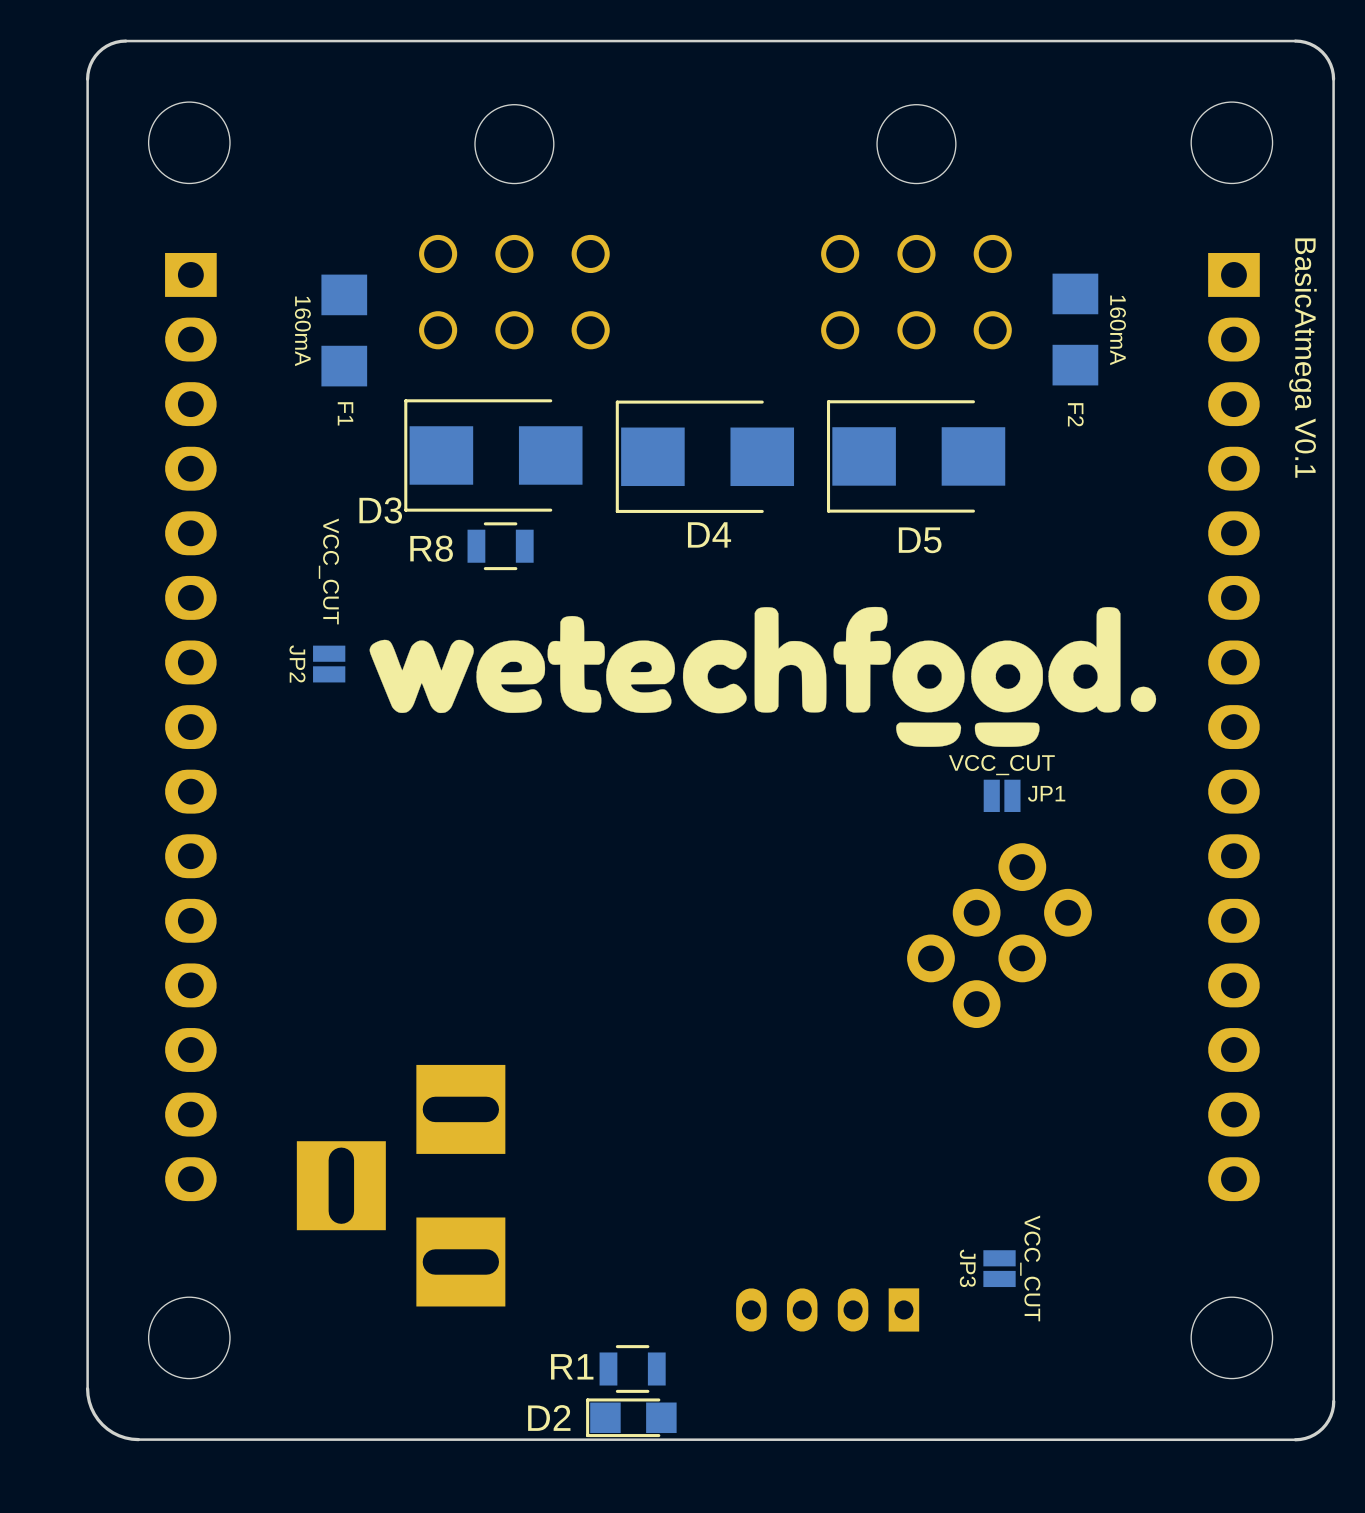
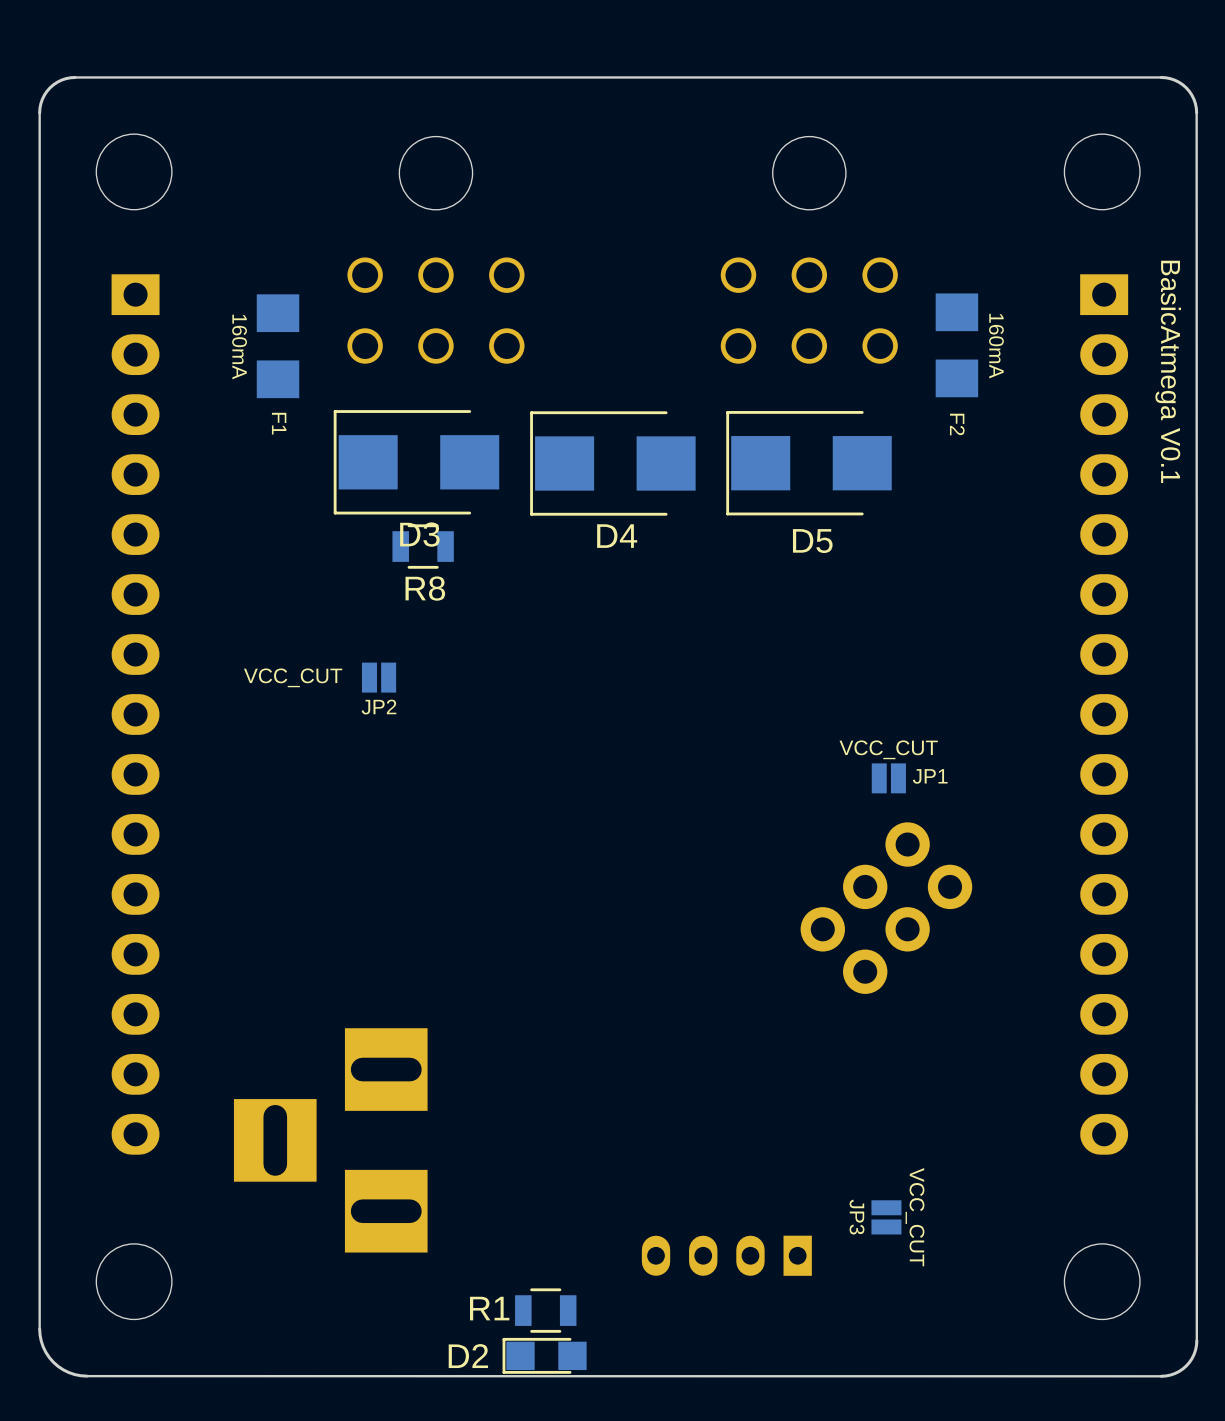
D3 name position: D3 (380, 510) -> D3 (419, 534)
R8 name position: R8 (431, 548) -> R8 (425, 588)
JP2 value position: VCC_CUT (328, 571) -> VCC_CUT (293, 677)
drawing: [369, 606, 1157, 747] -> none
JP2 rotation: 0° (329, 664) -> 90° clockwise (379, 677)
JP2 position: (329, 664) -> (379, 677)

